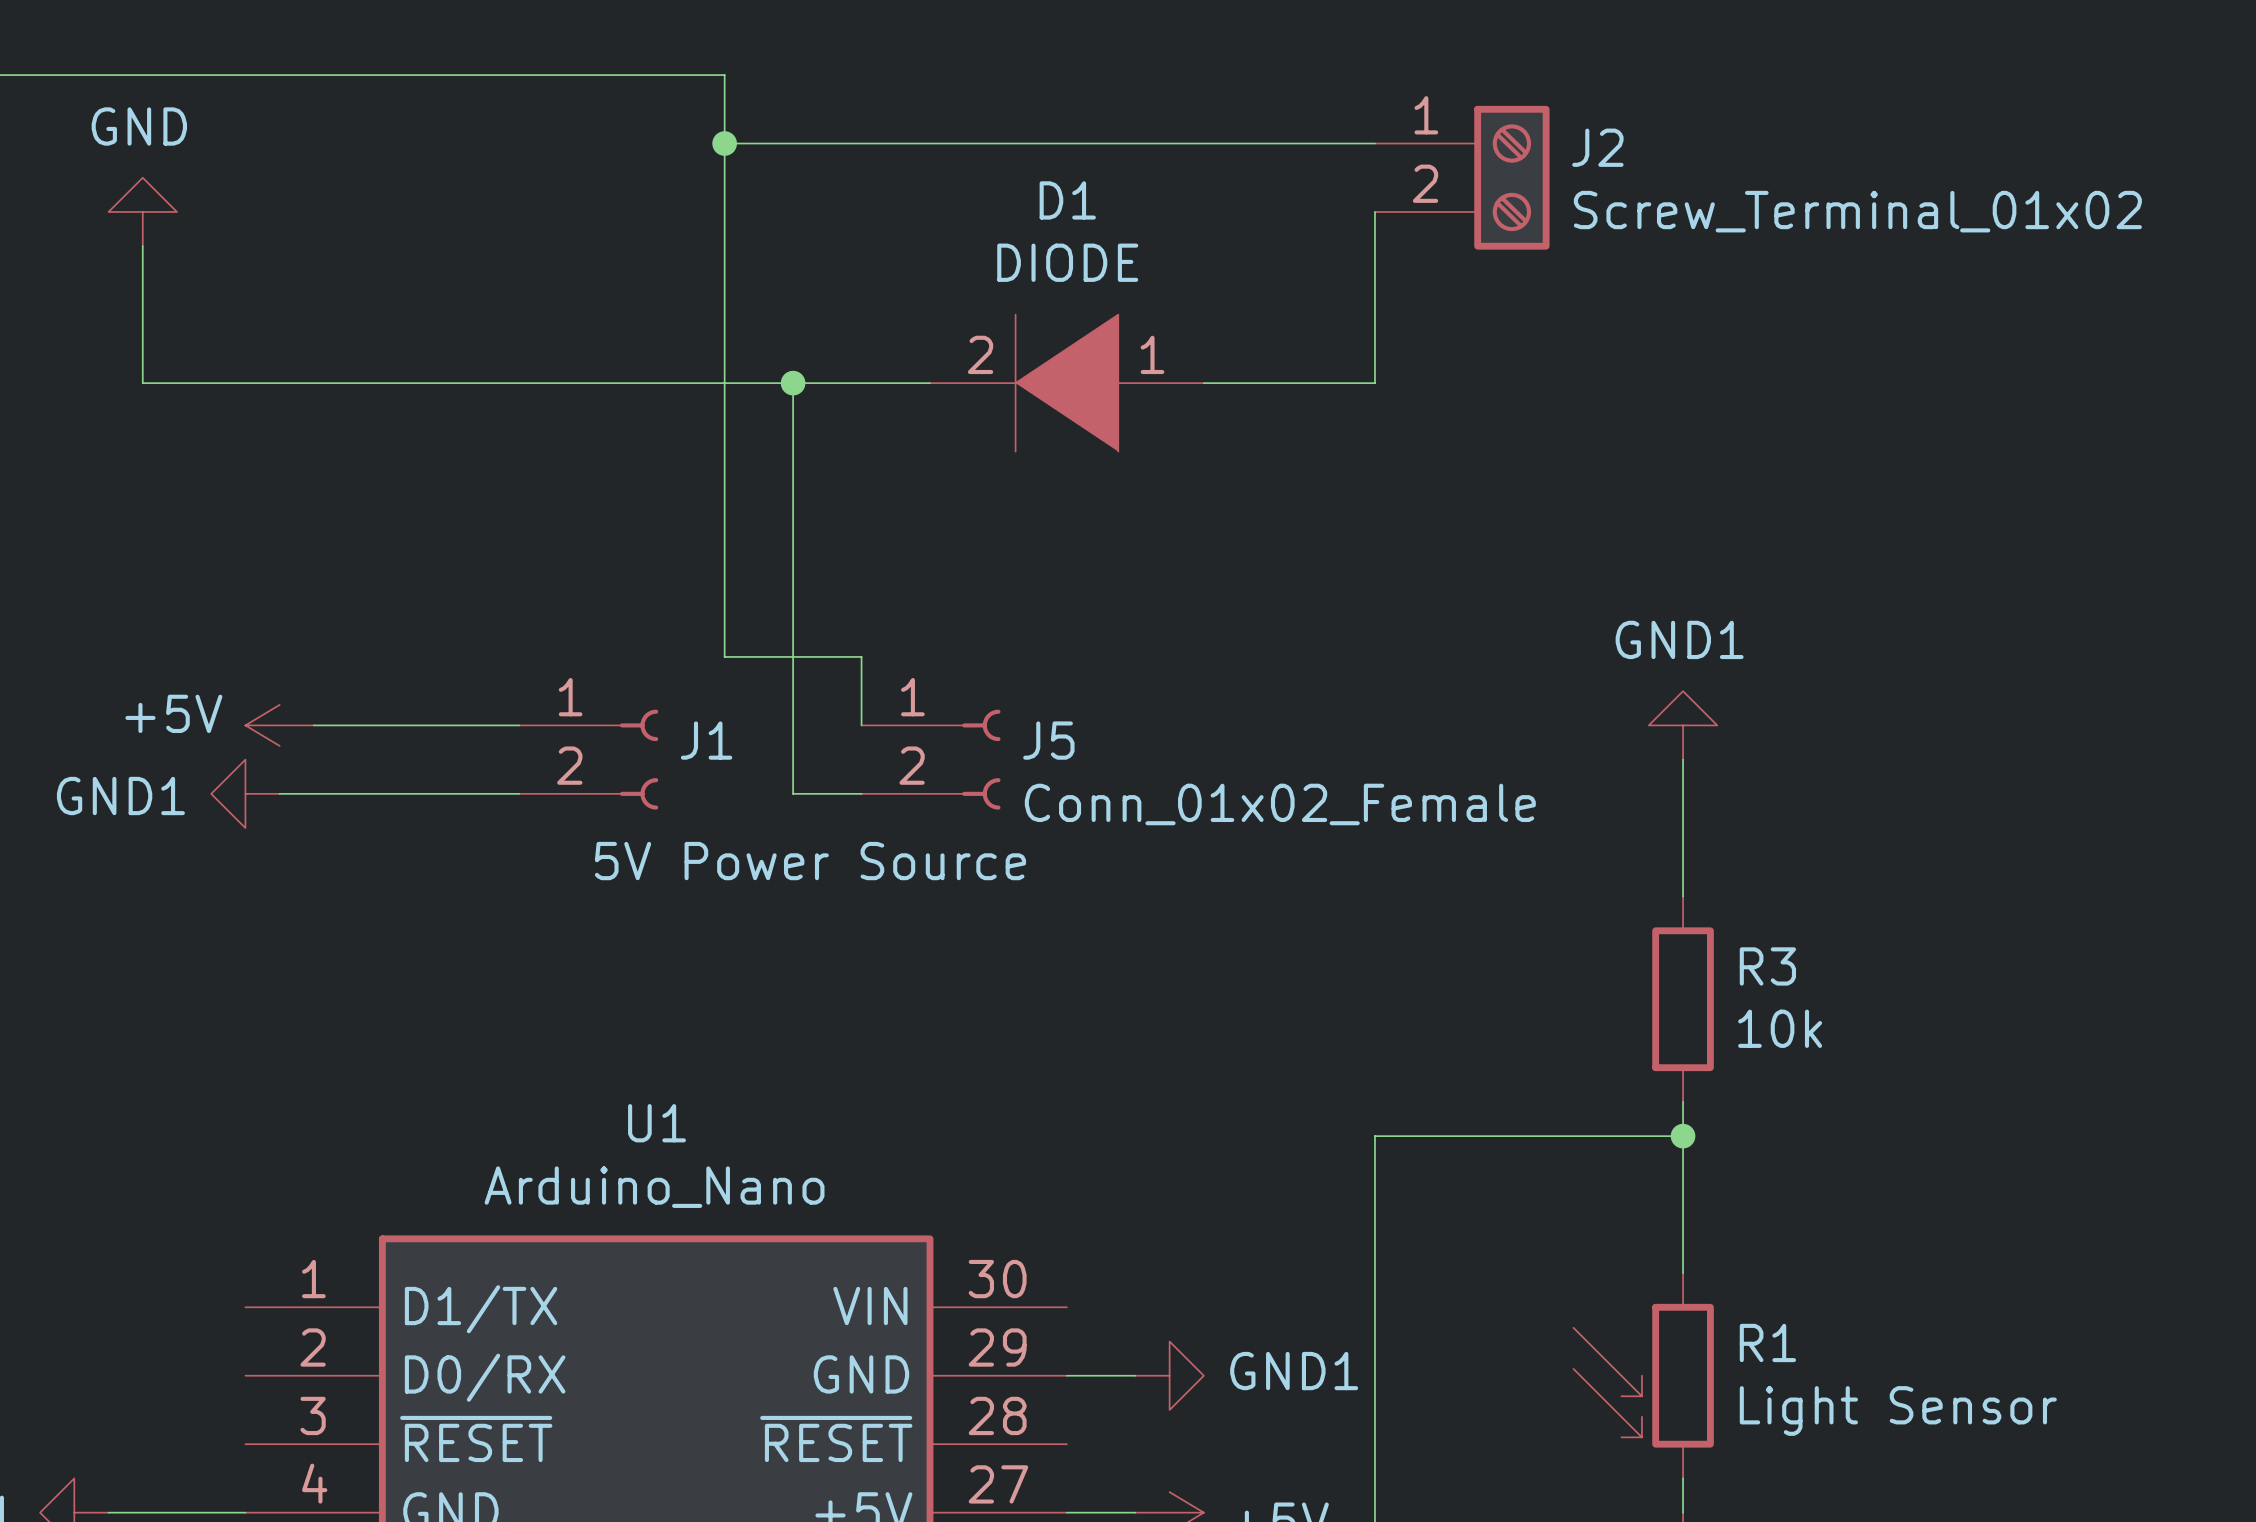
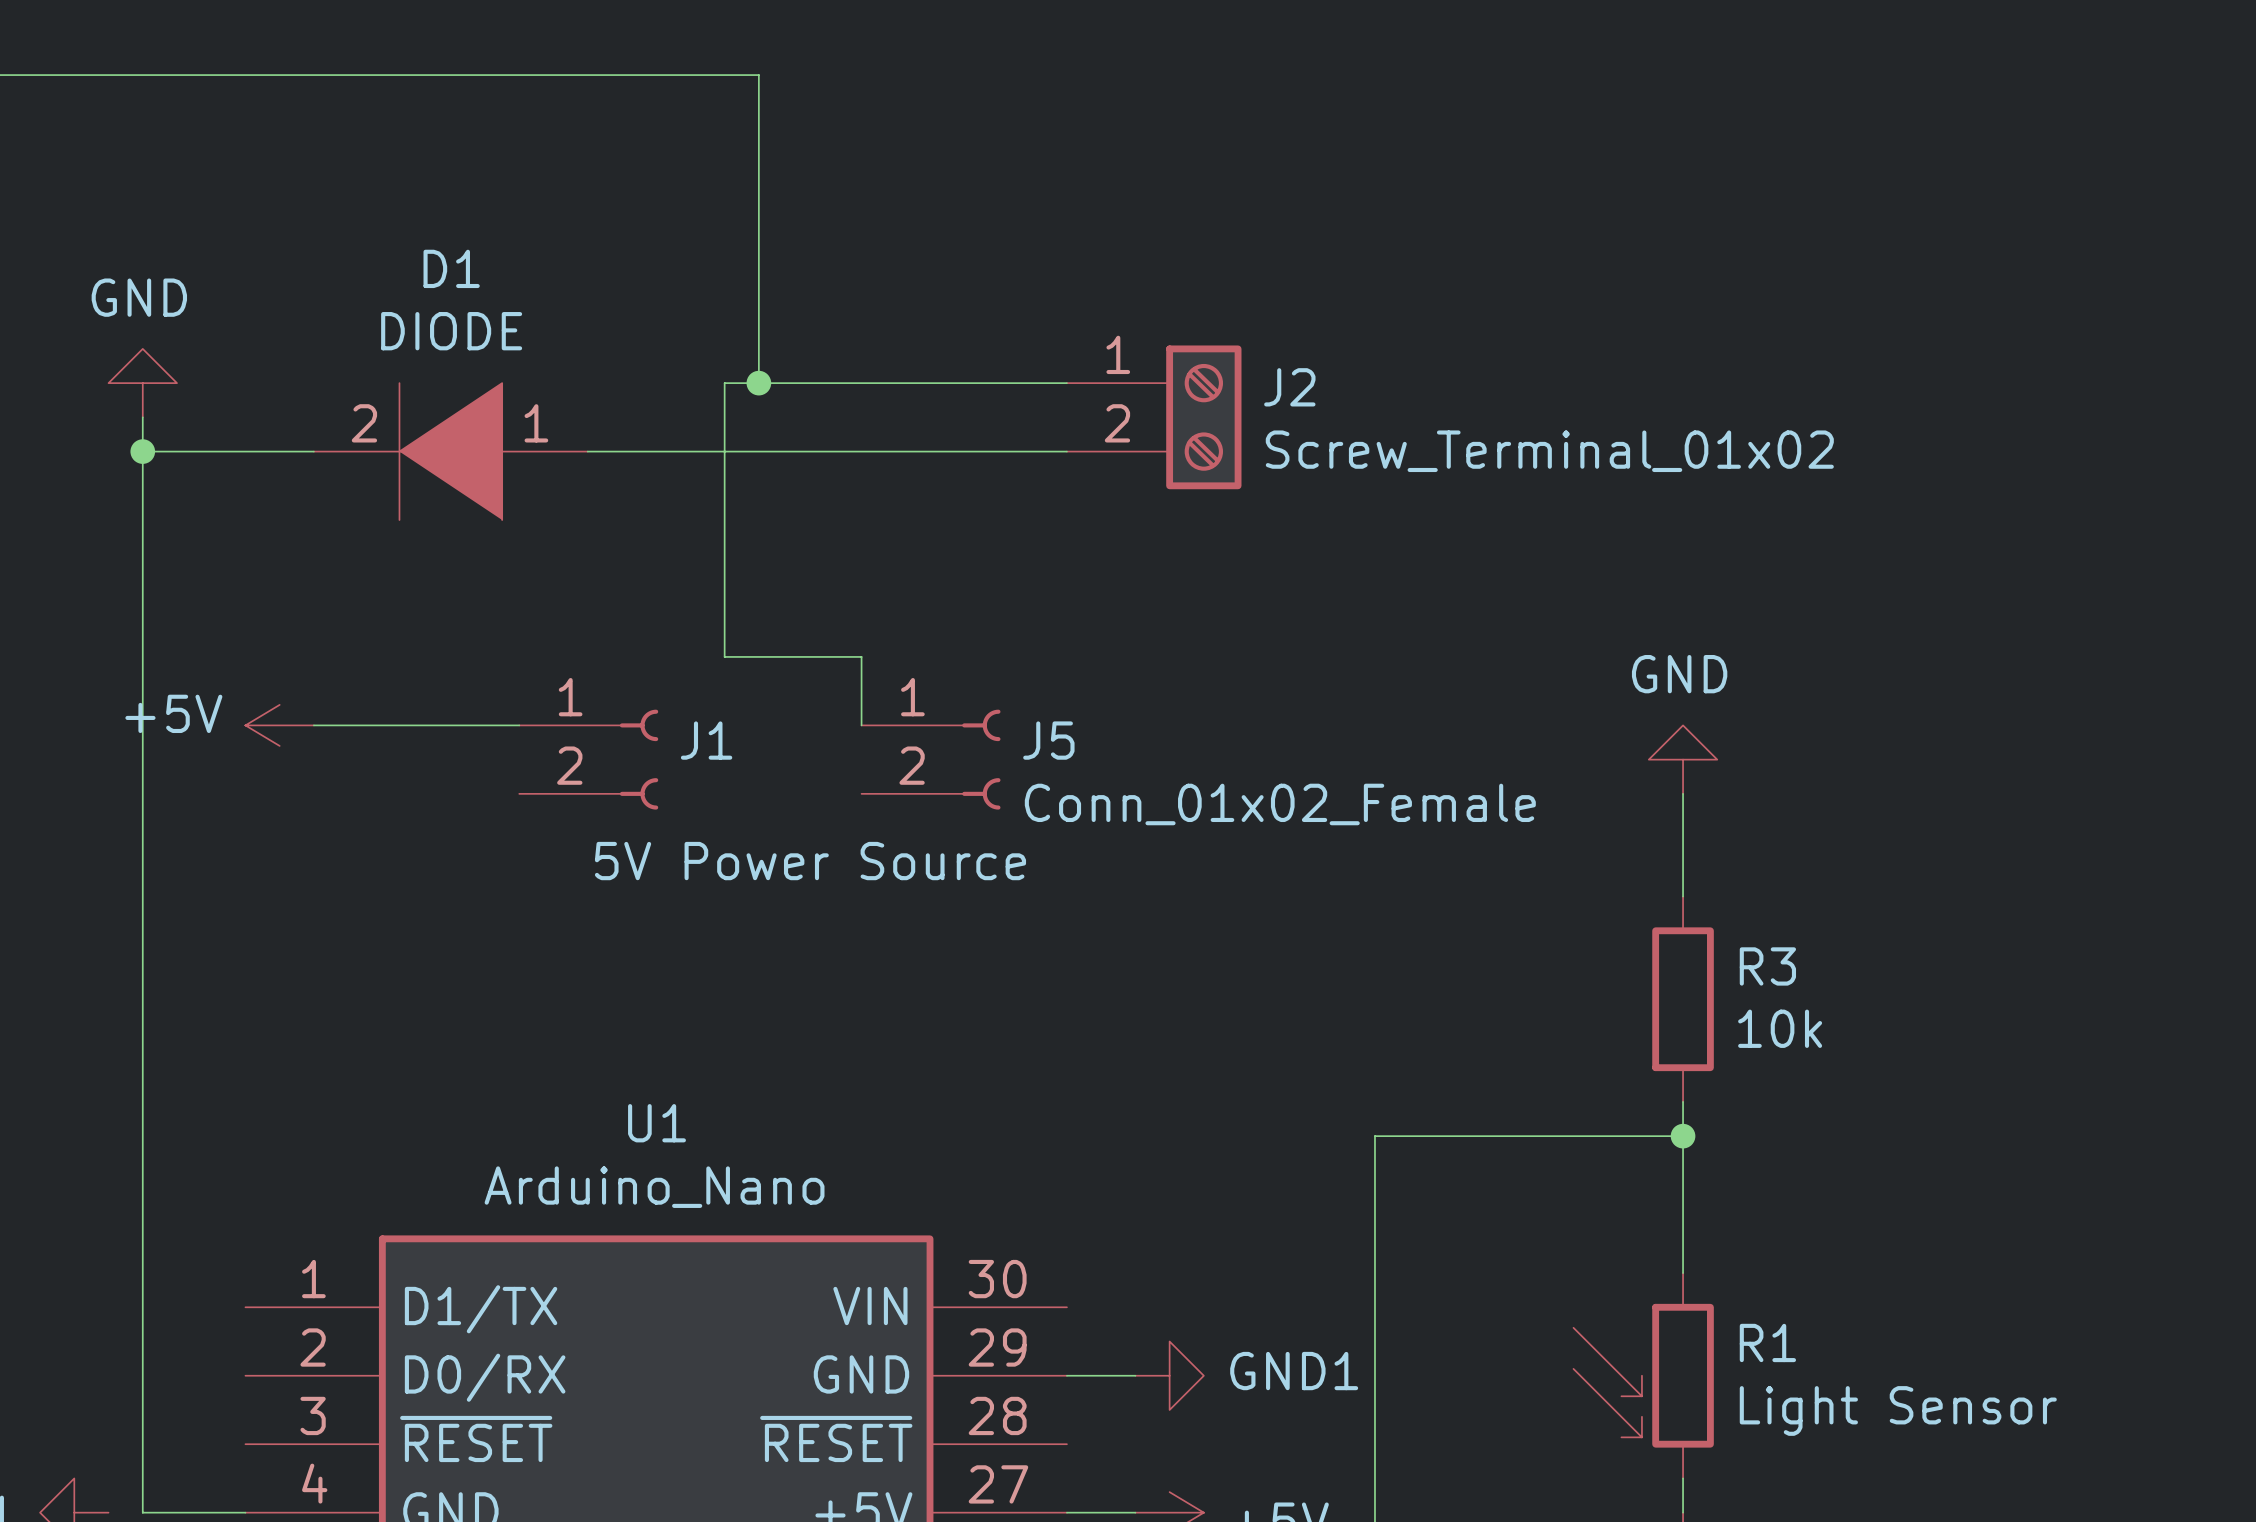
wire: (724, 75) (724, 383) (142, 383) (142, 246) -> (724, 75) (758, 75) (758, 383)
wire: (724, 143) (1374, 143) -> none
junction: (724, 143) -> none
J2 position: (1462, 177) -> (1154, 417)
power symbol position: GND (142, 211) -> GND (142, 383)
wire: (1374, 211) (1374, 383) (1203, 383) -> none
wire: (793, 383) (793, 793) (861, 793) -> none
junction position: (793, 383) -> (758, 383)
D1 position: (1066, 383) -> (450, 451)
wire: none -> (142, 451) (313, 451)
junction: none -> (142, 451)
wire: none -> (587, 451) (1066, 451)
power symbol: GND1 (1683, 725) -> none
power symbol: none -> GND (1683, 759)
power symbol: GND1 (245, 793) -> none
wire: (279, 793) (519, 793) -> none
wire: (108, 1512) (142, 1512) -> (142, 417) (142, 1512)

